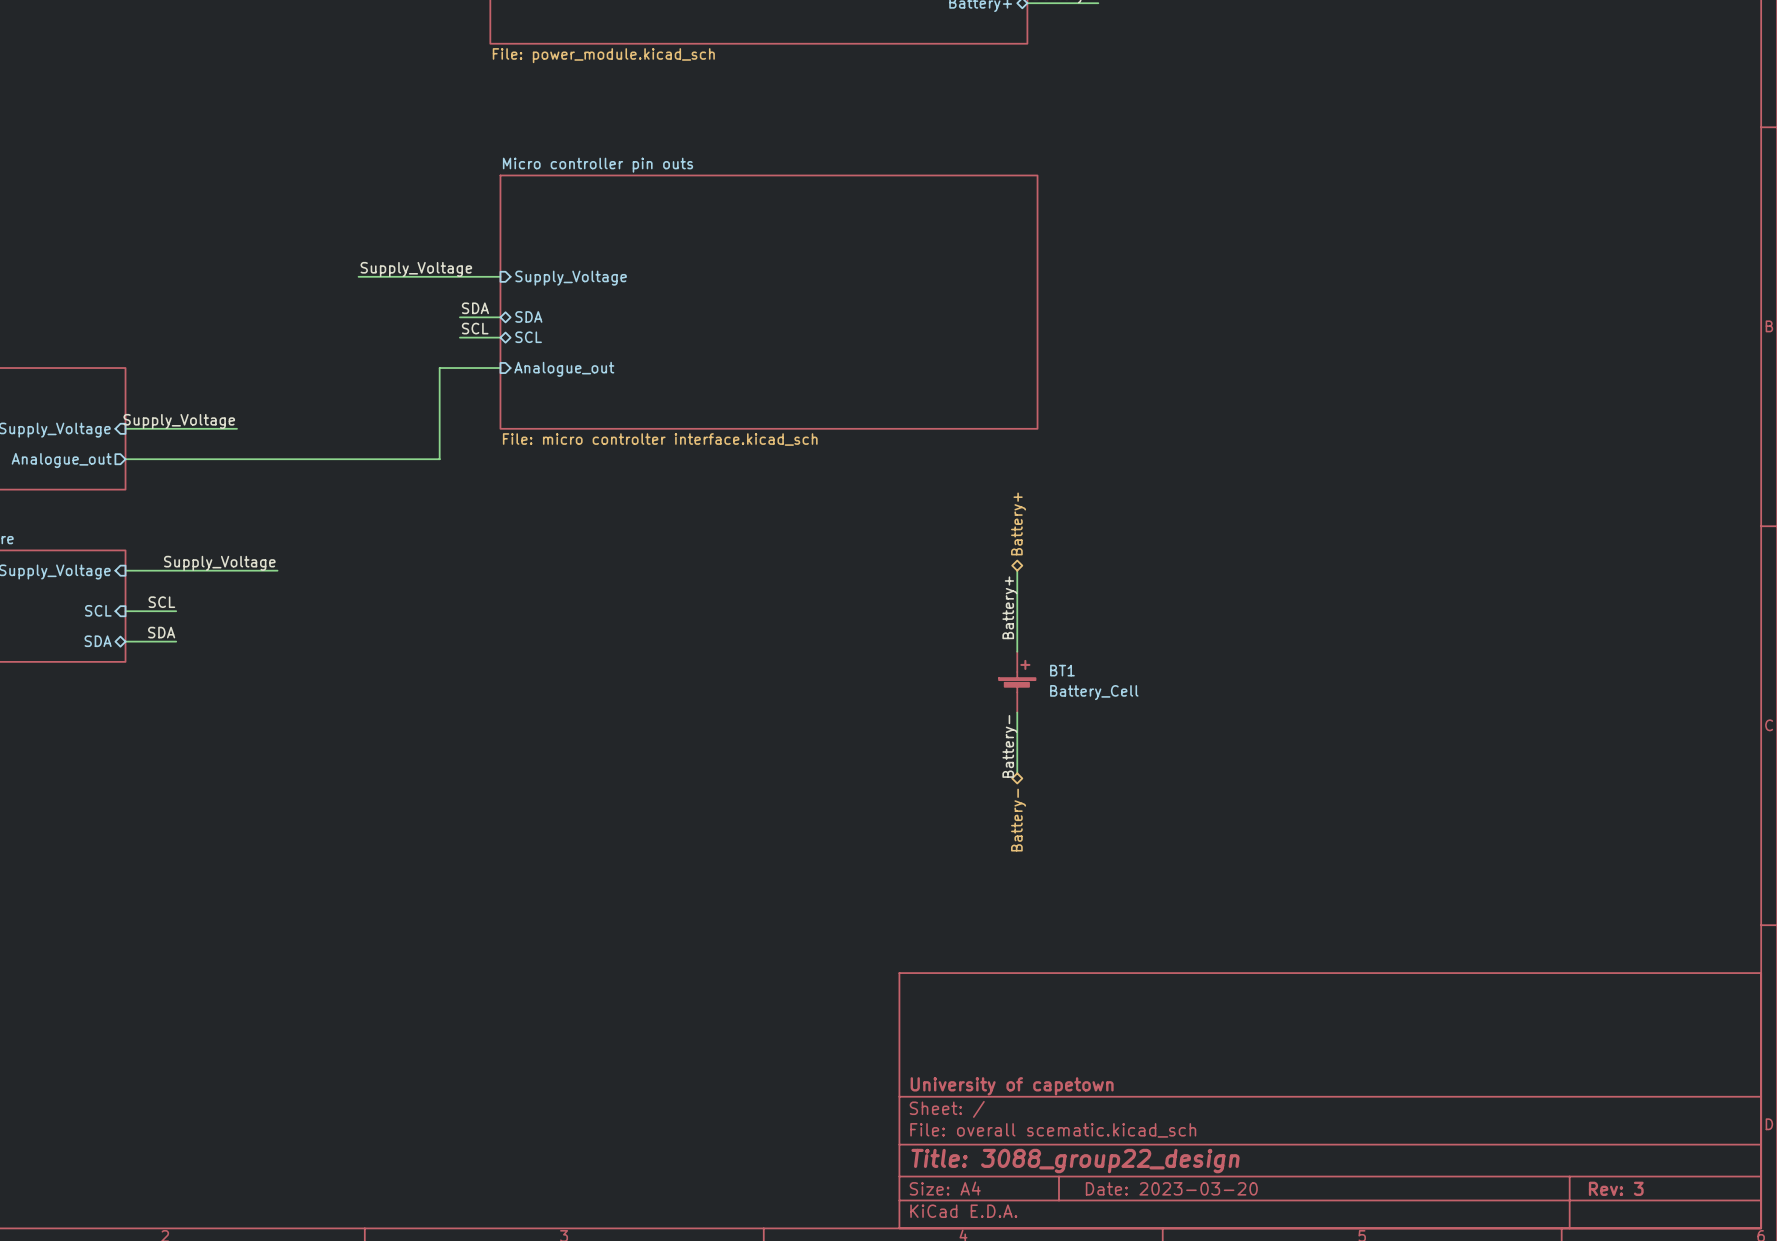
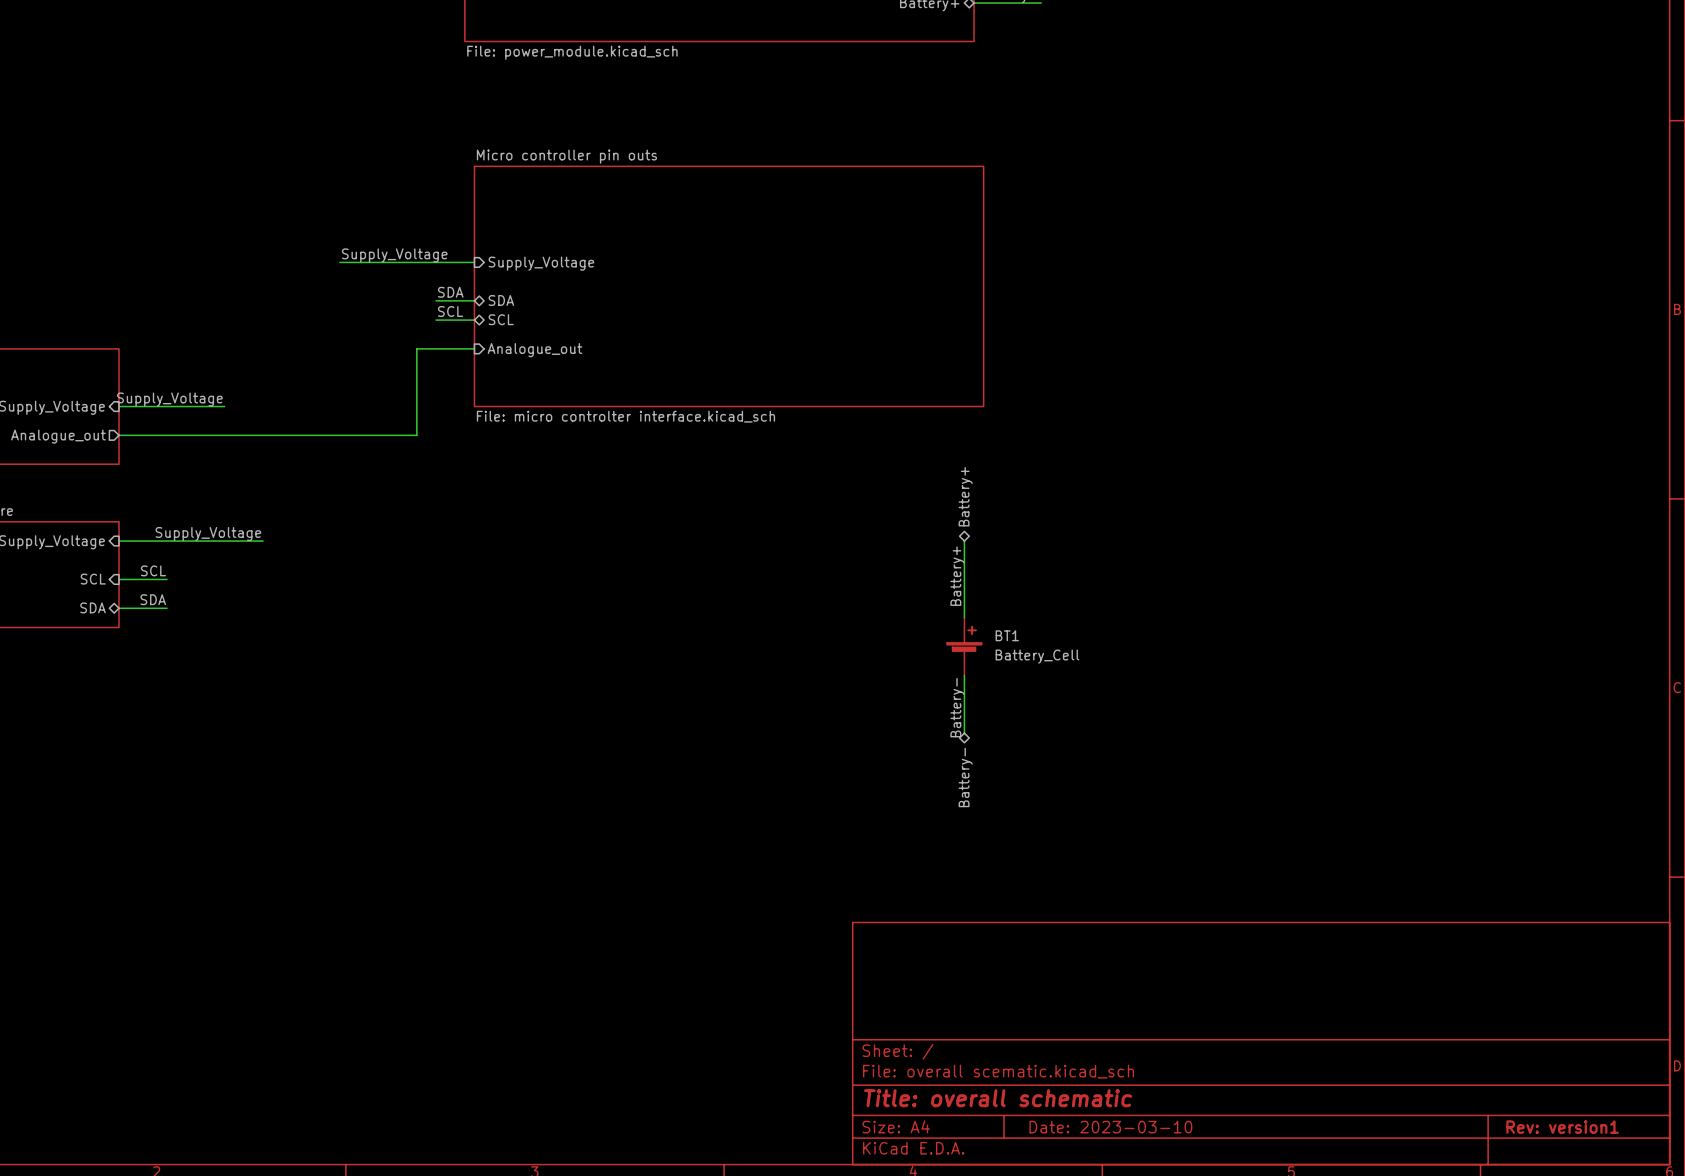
title block: University of capetown (1012, 1086) -> none
title block: Title: 3088_group22_design (1075, 1161) -> Title: overall schematic (998, 1098)
title block: Date: 2023-03-20 (1171, 1188) -> Date: 2023-03-10 (1110, 1127)
title block: Rev: 3 (1616, 1188) -> Rev: version1 (1562, 1127)

